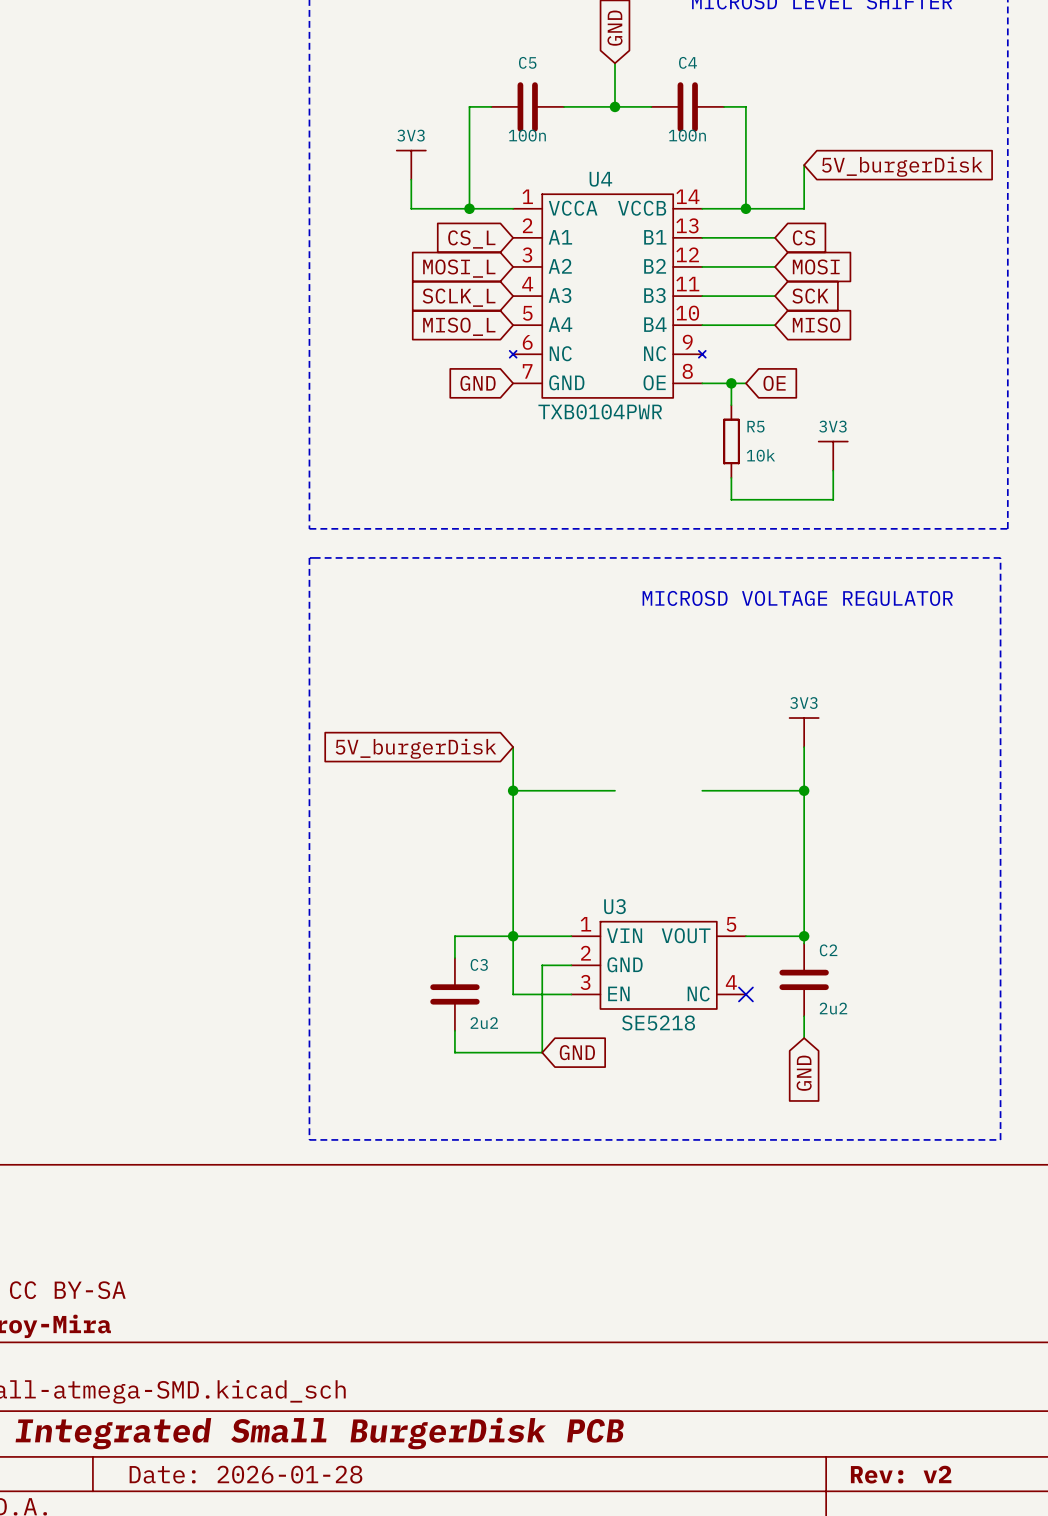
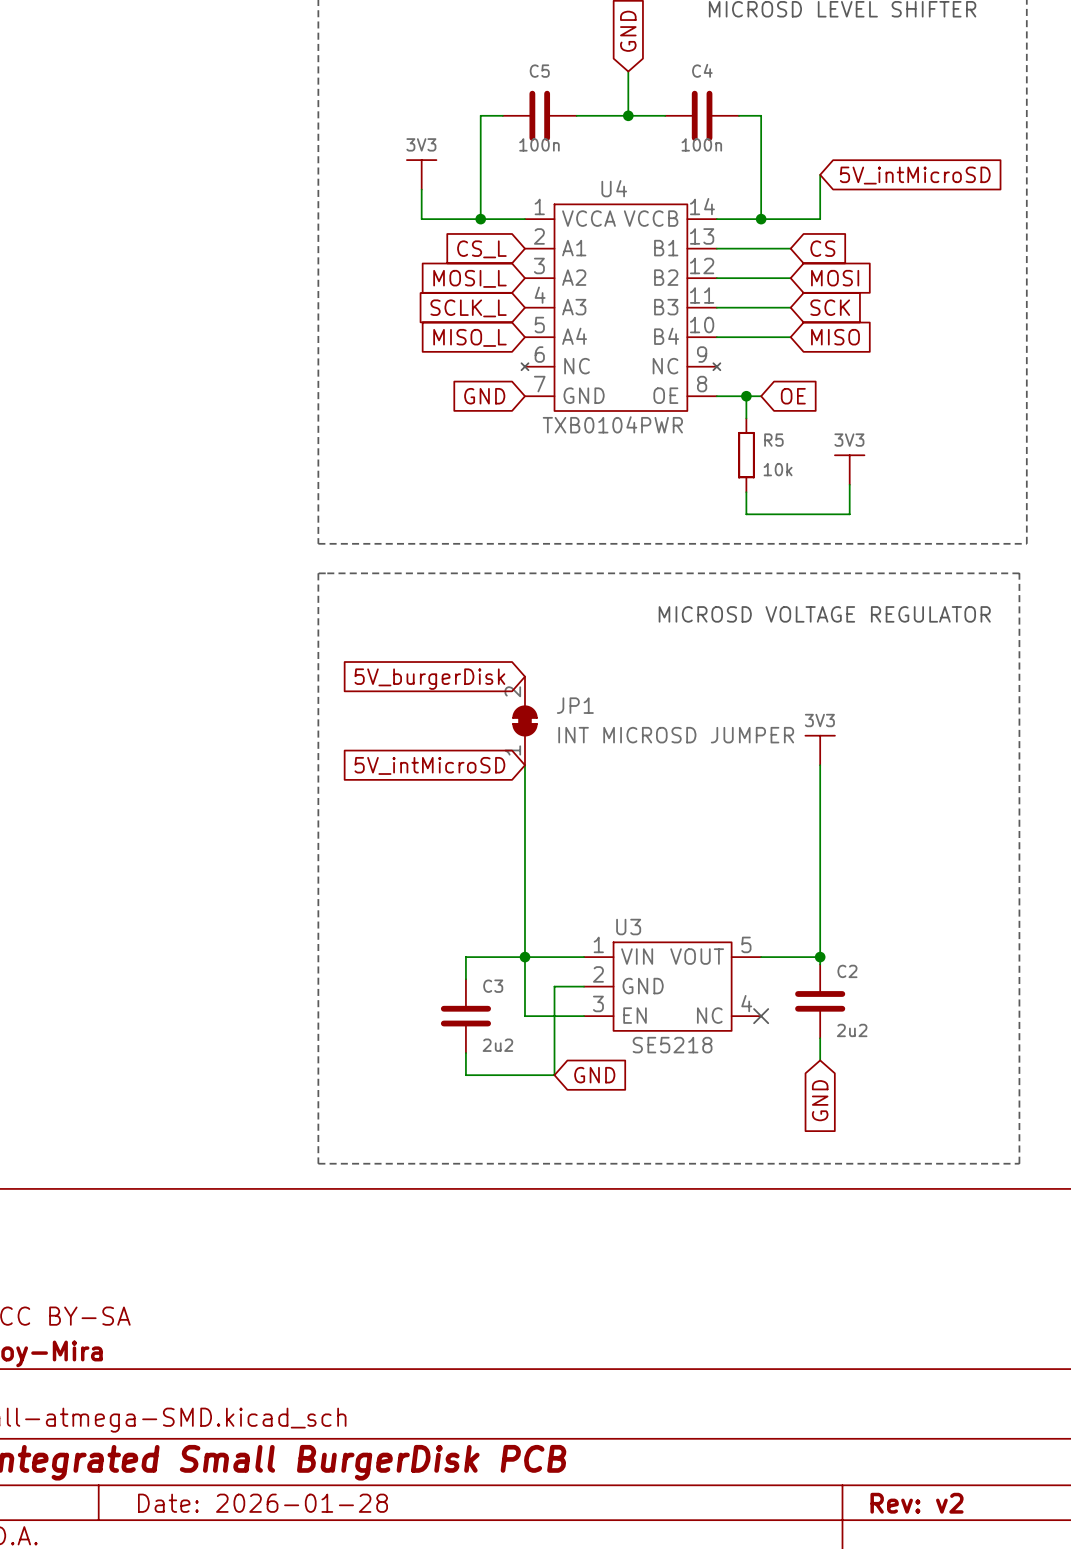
global label: 5V_burgerDisk (902, 166) -> 5V_intMicroSD (915, 175)
global label: none -> 5V_burgerDisk (429, 679)
JP1: none -> INT MICROSD JUMPER (524, 720)
global label: 5V_burgerDisk (415, 748) -> 5V_intMicroSD (429, 765)
wire: (513, 790) (614, 790) -> none
junction: (513, 790) -> none
wire: (702, 790) (804, 790) -> none
junction: (804, 790) -> none

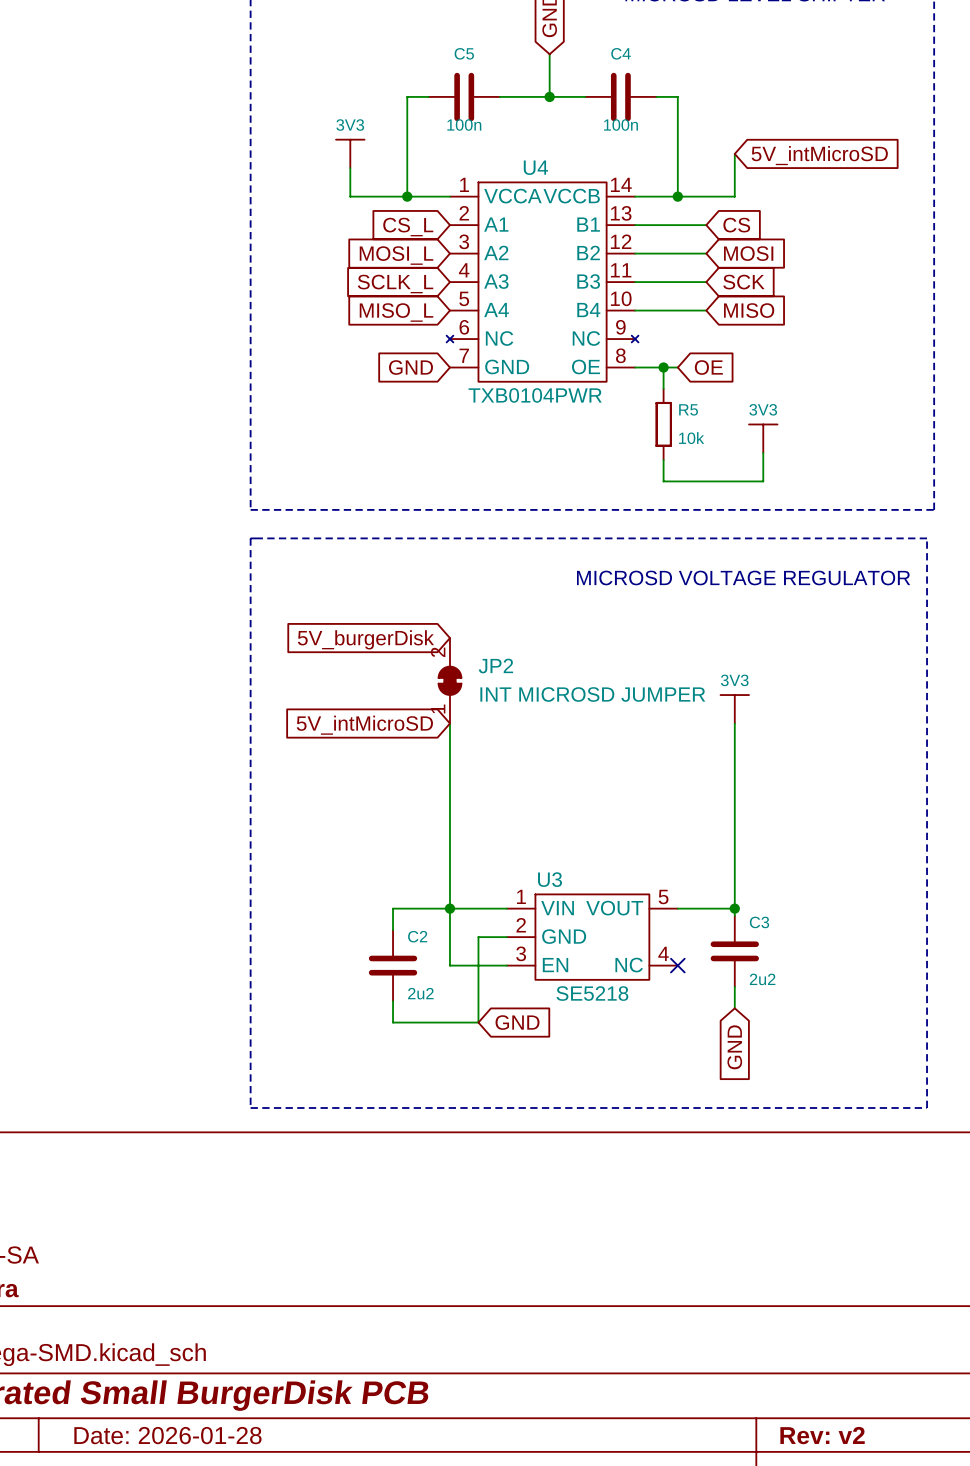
JP1 name: JP1 (575, 705) -> JP2 (495, 666)
C2 name: C2 (847, 971) -> C3 (759, 922)
C3 name: C3 (493, 986) -> C2 (417, 936)

